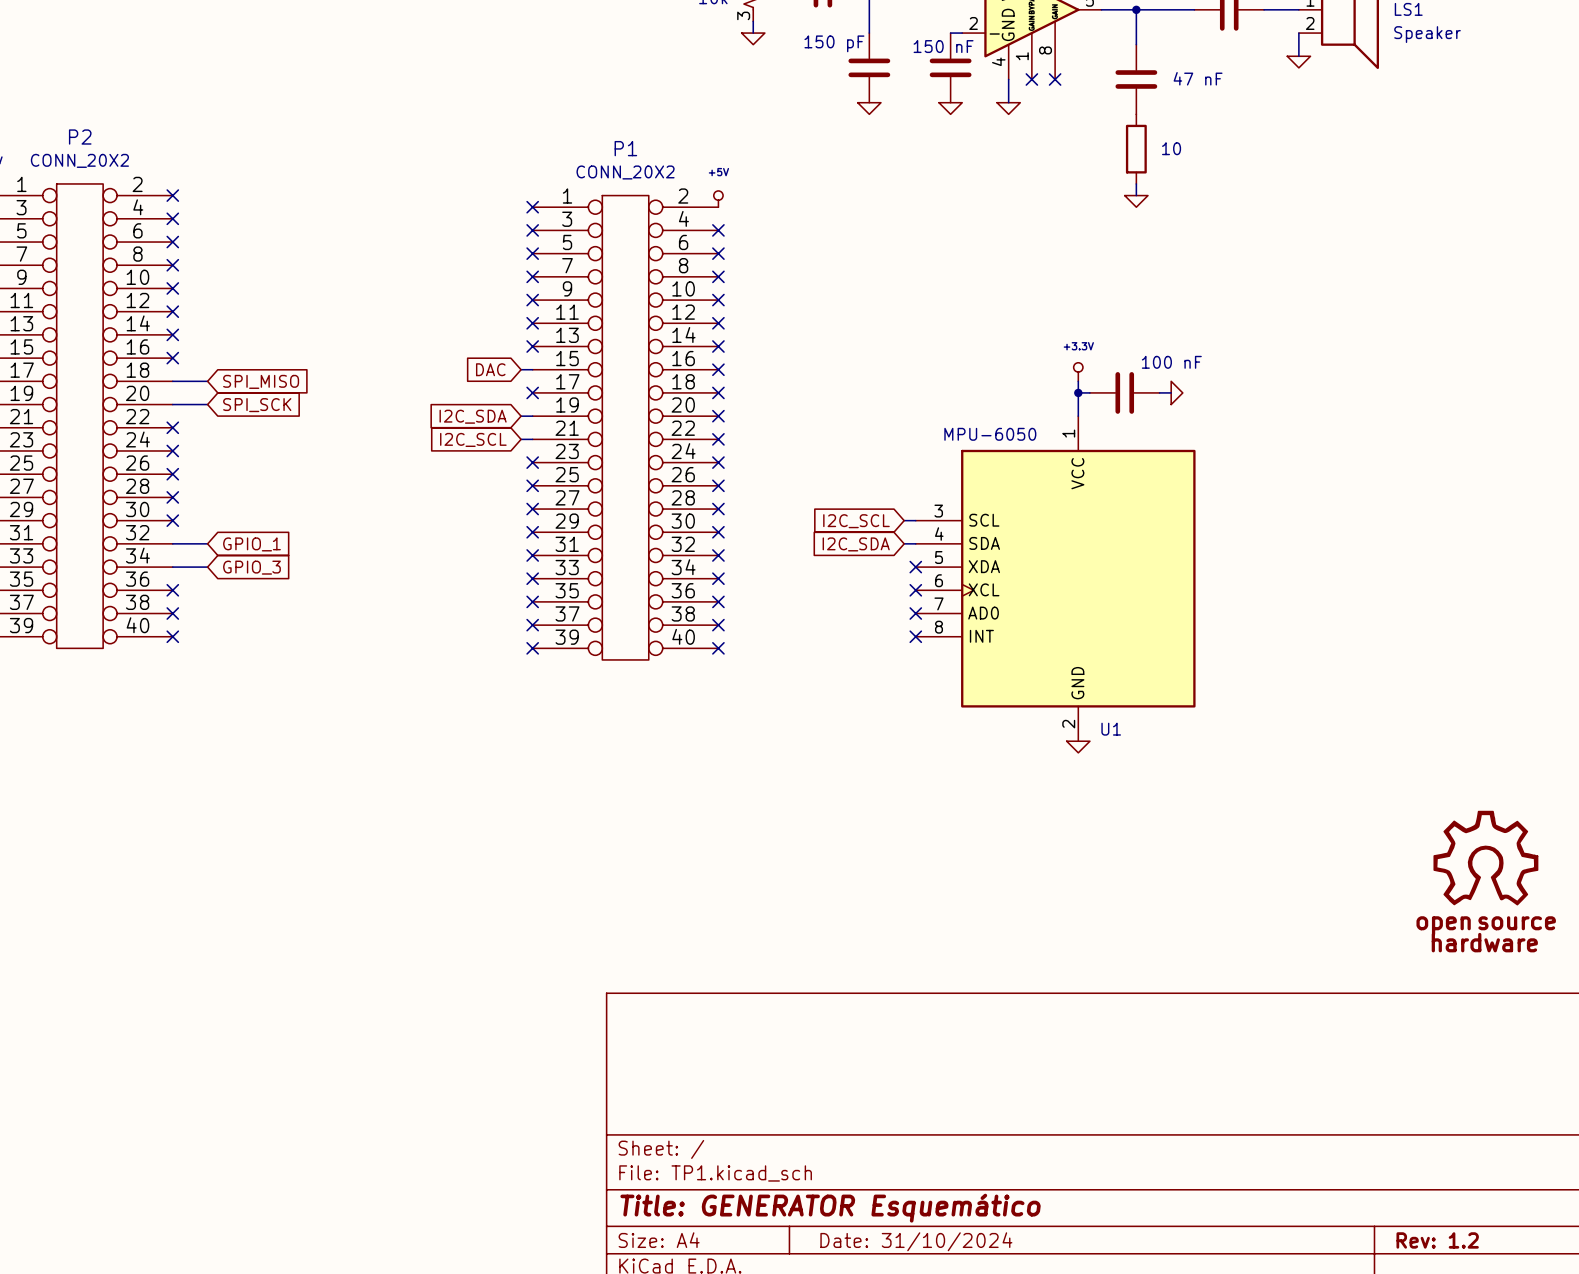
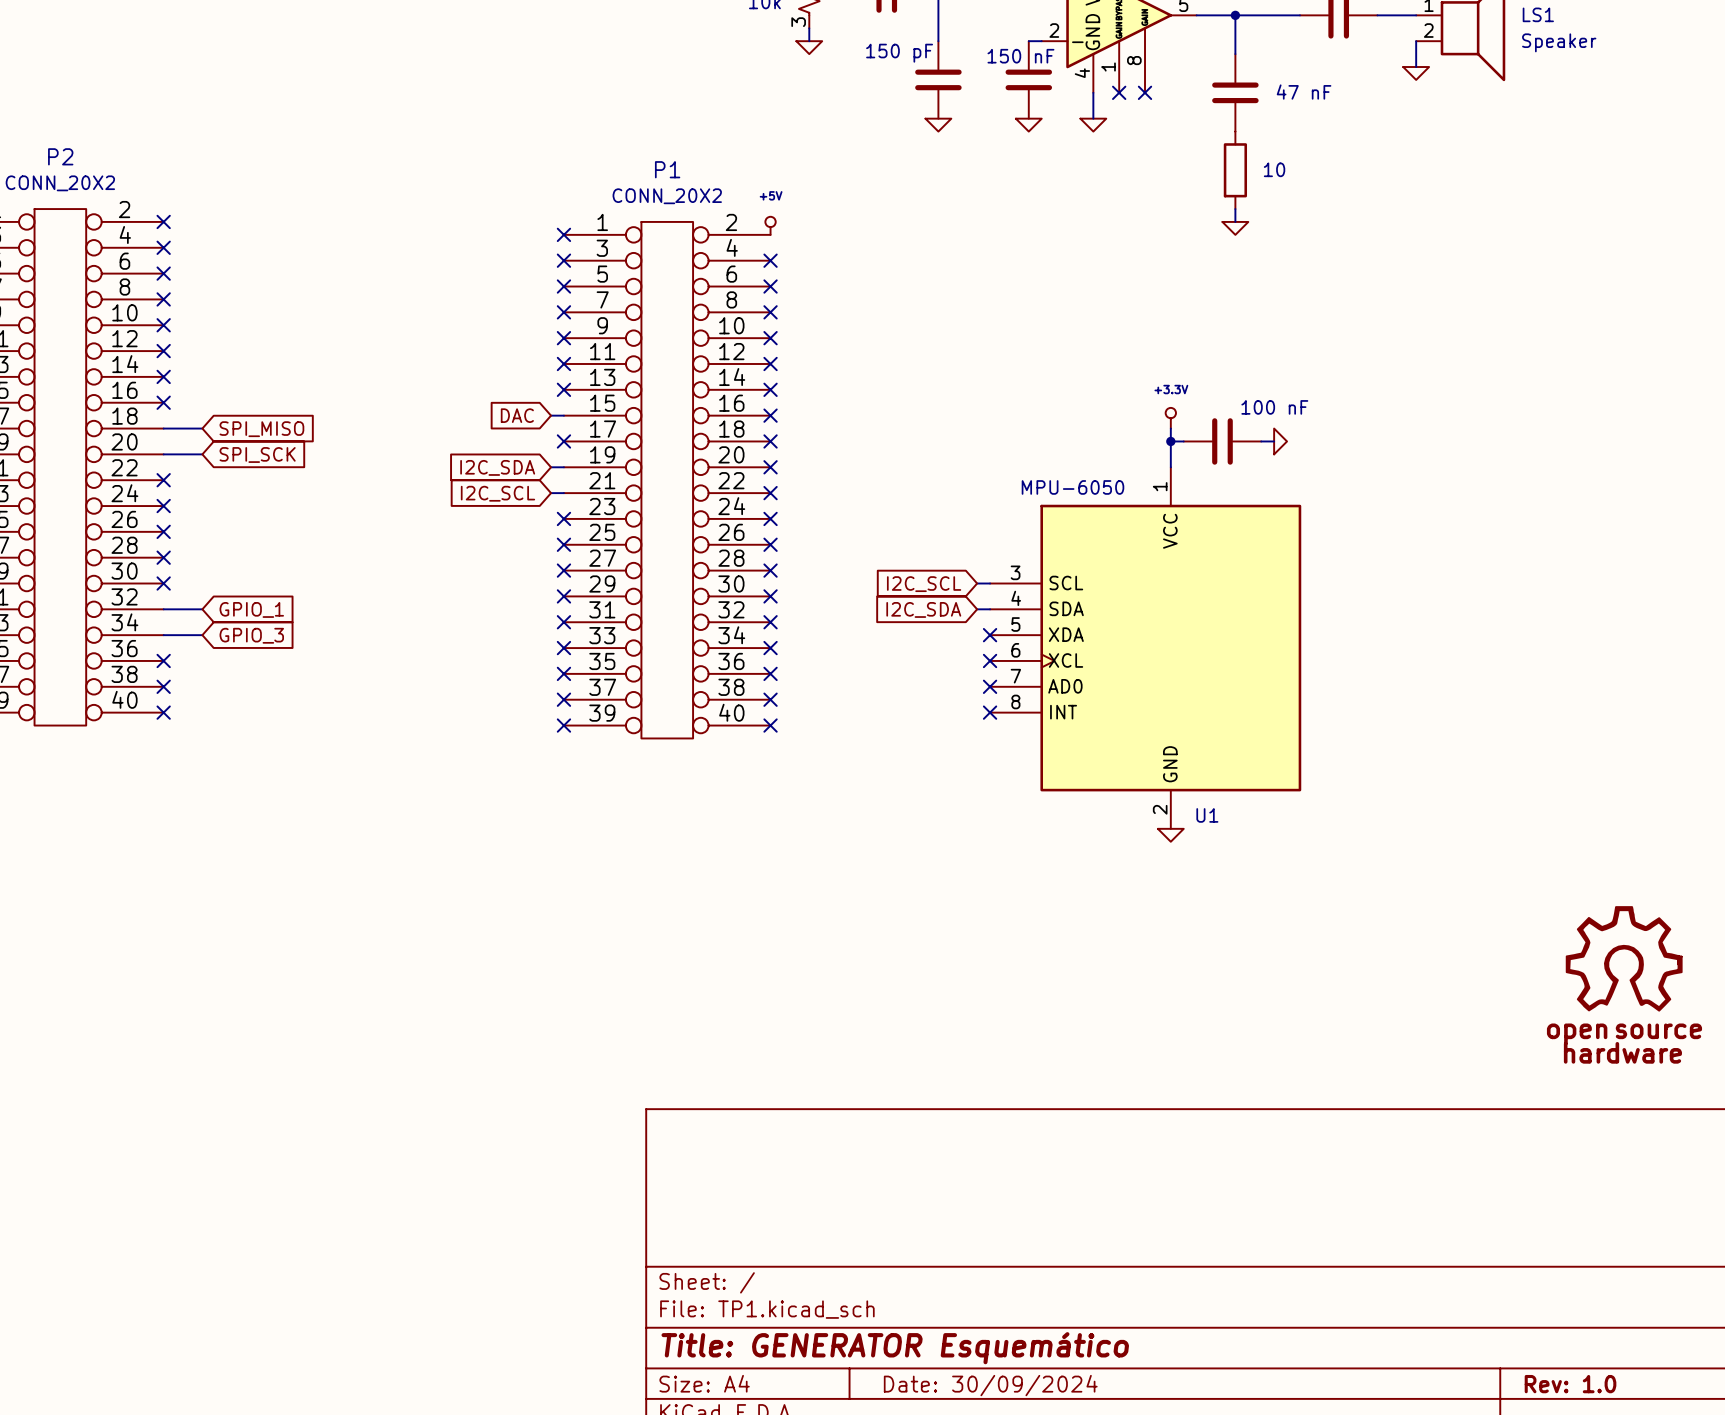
title block: Rev: 1.2 (1437, 1240) -> Rev: 1.0 (1570, 1384)
title block: Date: 31/10/2024 (916, 1241) -> Date: 30/09/2024 (990, 1385)

